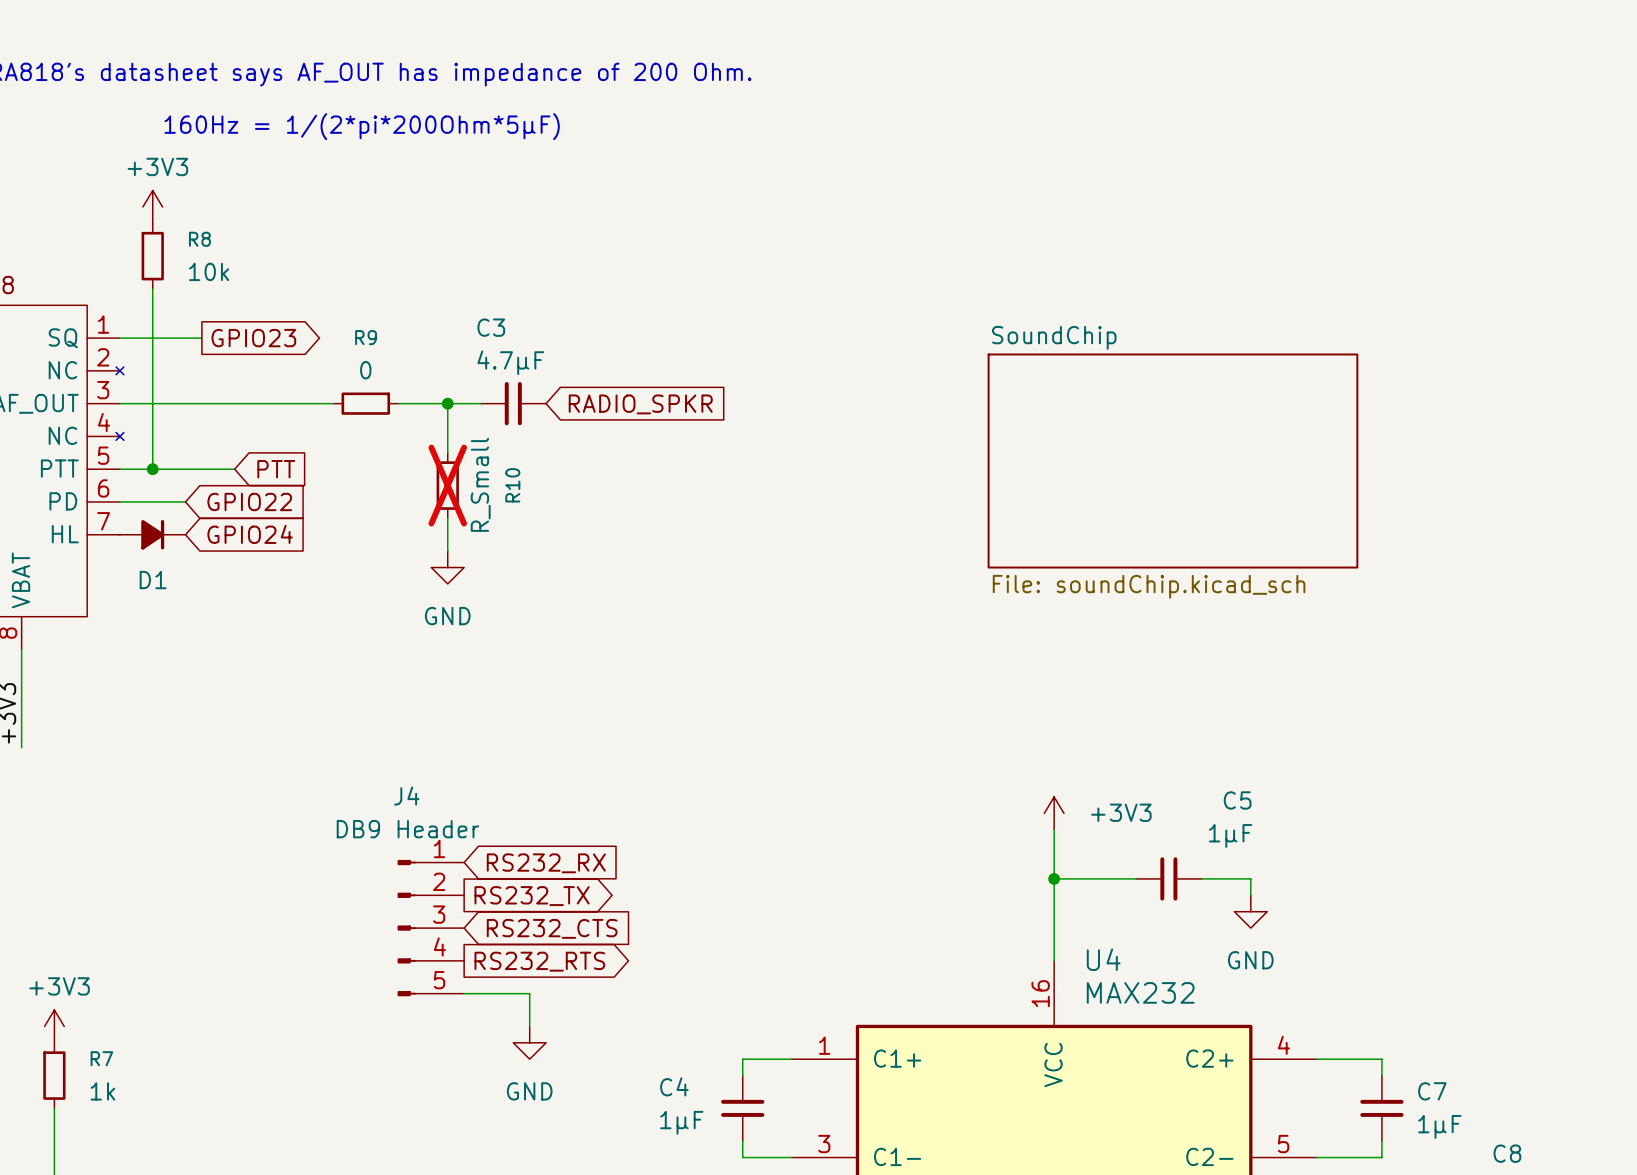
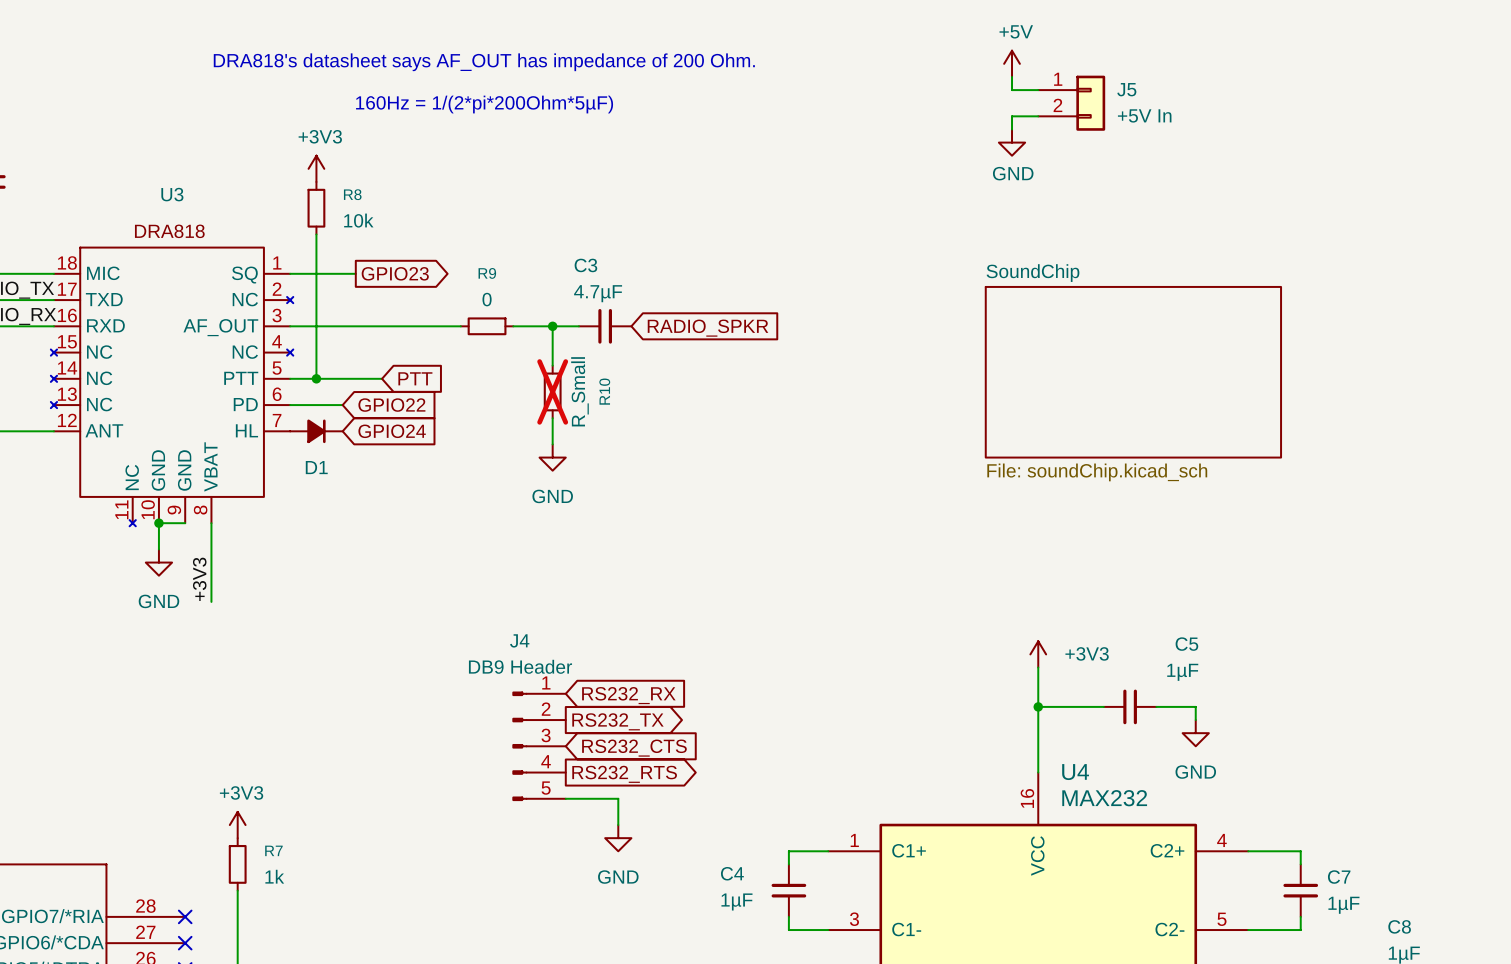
power symbol: none -> +5V (1012, 63)
wire: none -> (1012, 76) (1012, 90) (1038, 90)
J5: none -> +5V In (1071, 103)
wire: none -> (1038, 116) (1012, 116) (1012, 129)
power symbol: none -> GND (1012, 142)

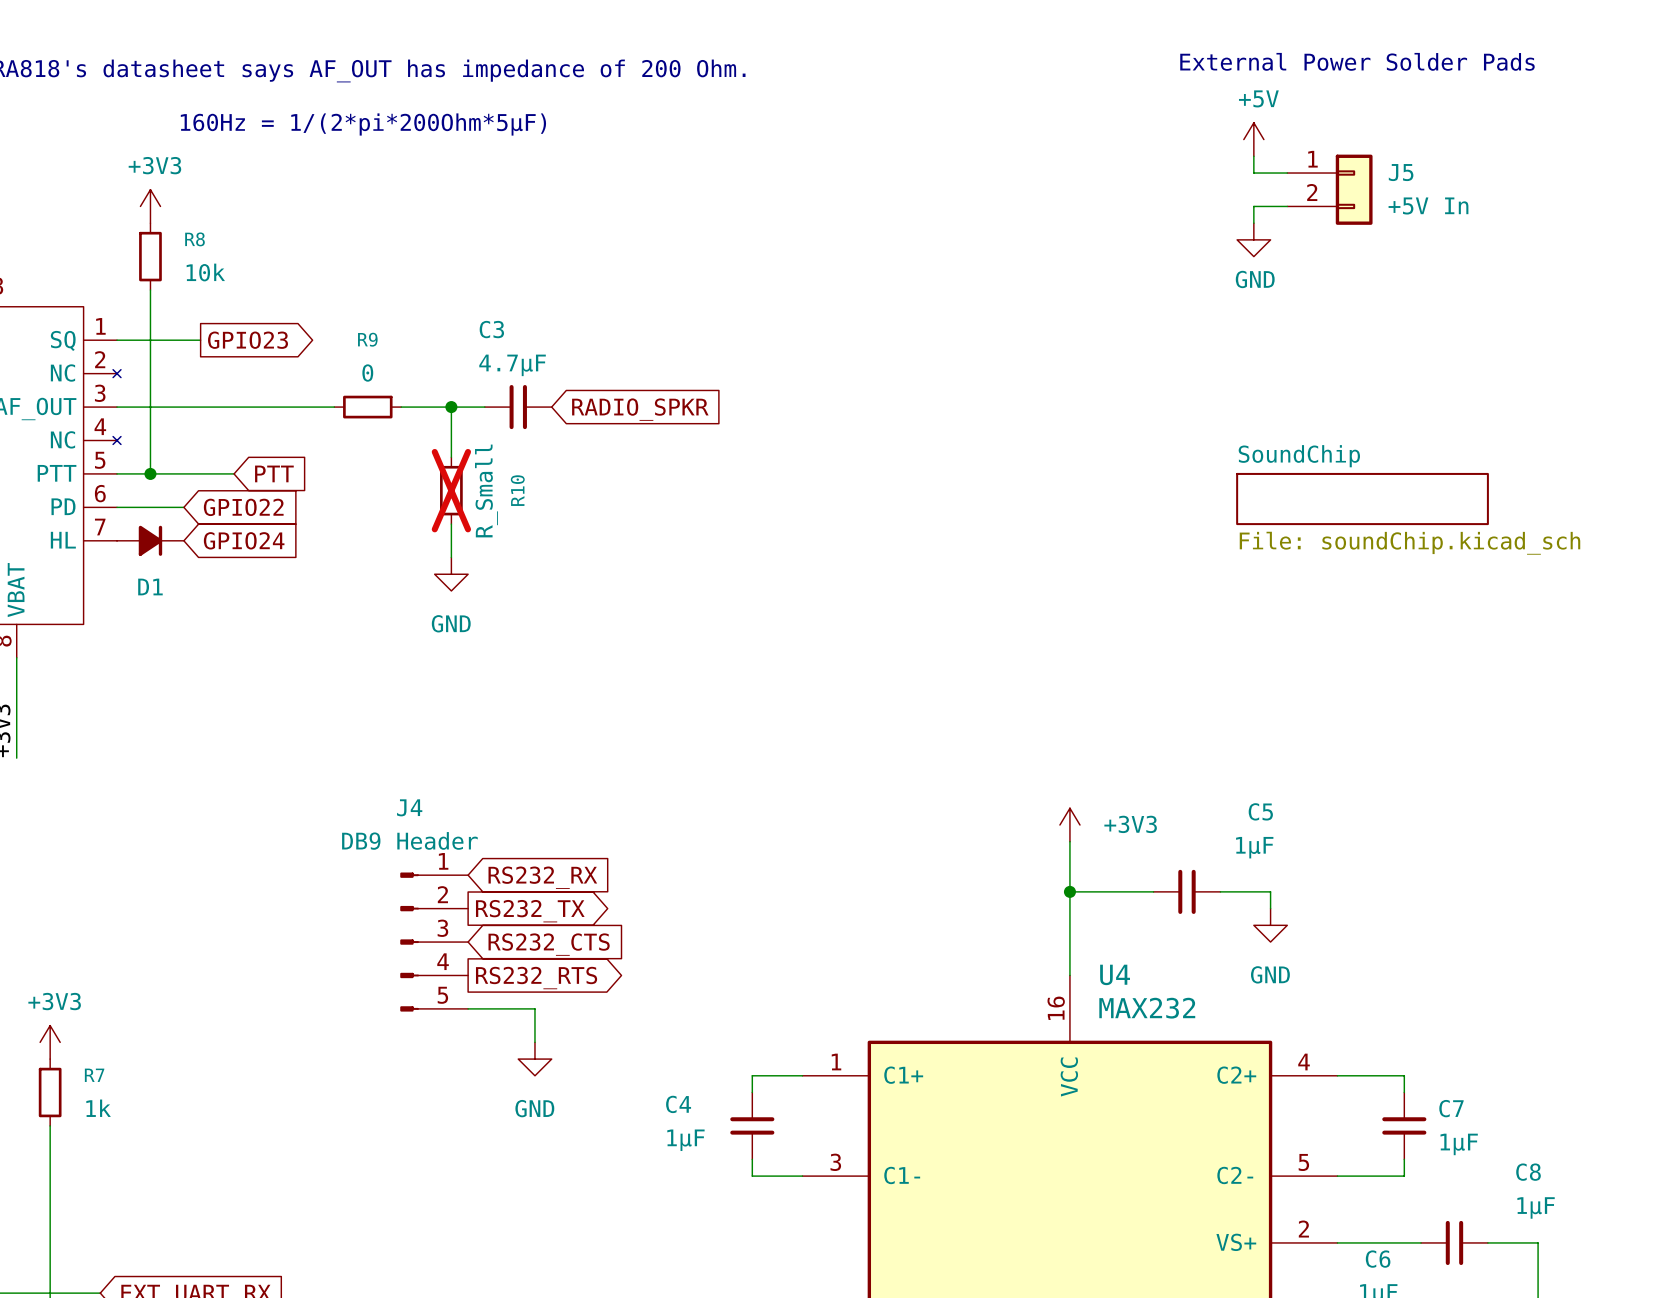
text: none -> External Power Solder Pads (1357, 61)
power symbol position: +5V (1012, 63) -> +5V (1253, 139)
wire: (1012, 76) (1012, 90) (1038, 90) -> (1253, 156) (1253, 173) (1287, 173)
J5 position: (1071, 103) -> (1329, 189)
wire: (1038, 116) (1012, 116) (1012, 129) -> (1287, 206) (1253, 206) (1253, 223)
power symbol position: GND (1012, 142) -> GND (1253, 239)
sheet SoundChip: File: soundChip.kicad_sch (1133, 372) -> none
sheet SoundChip: none -> File: soundChip.kicad_sch (1362, 499)

